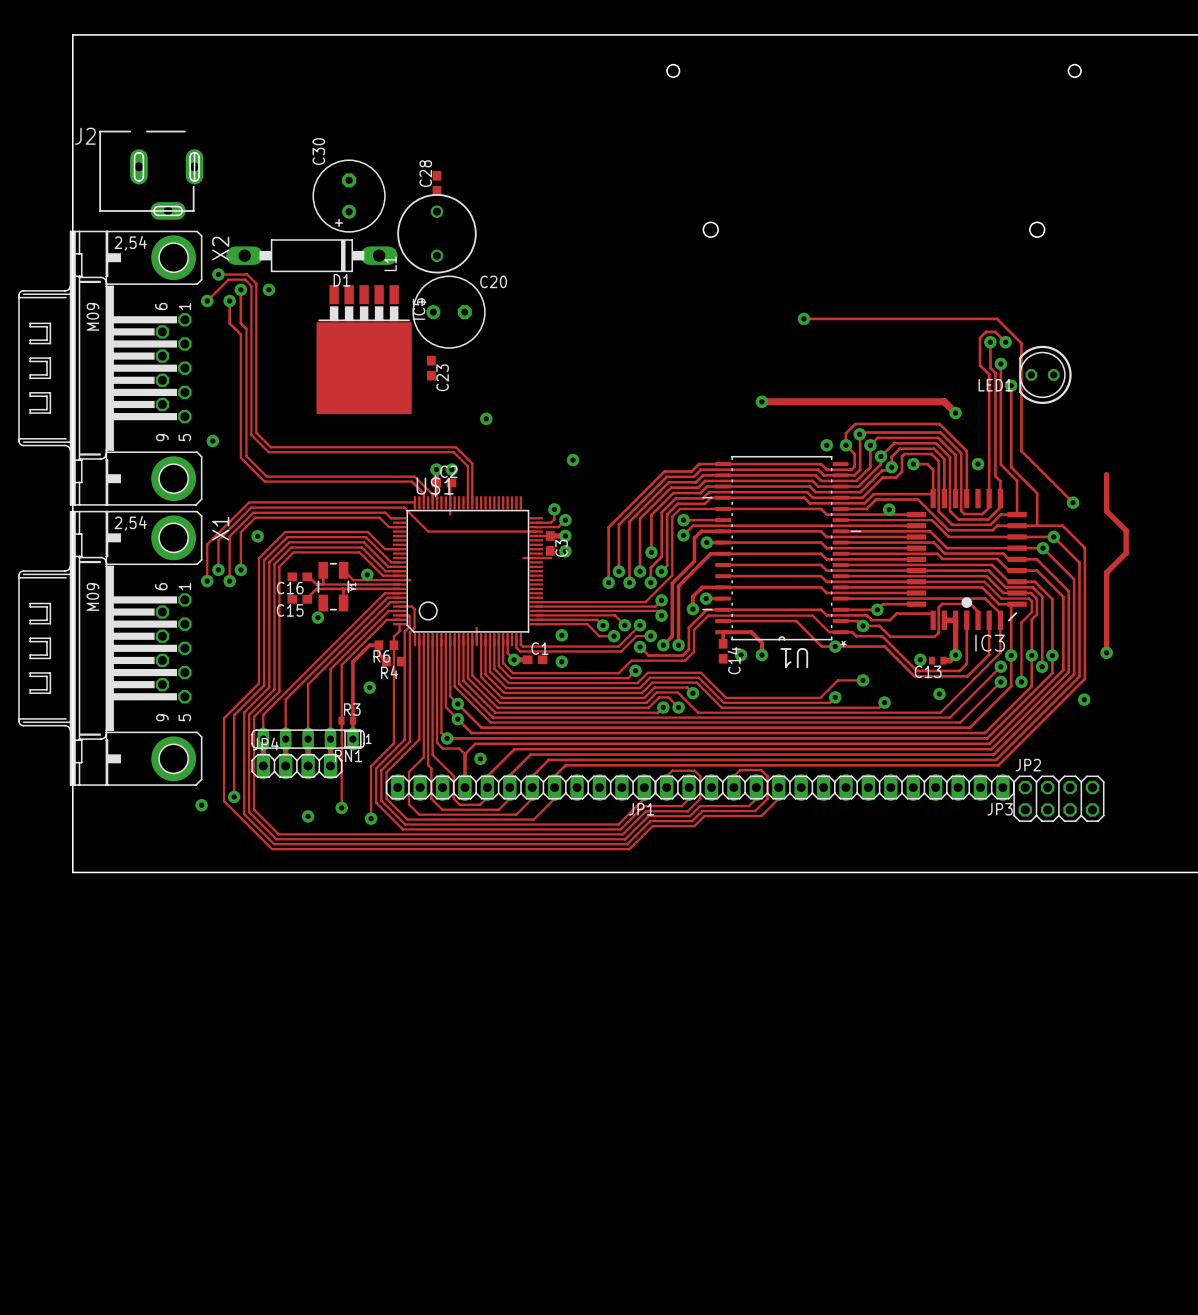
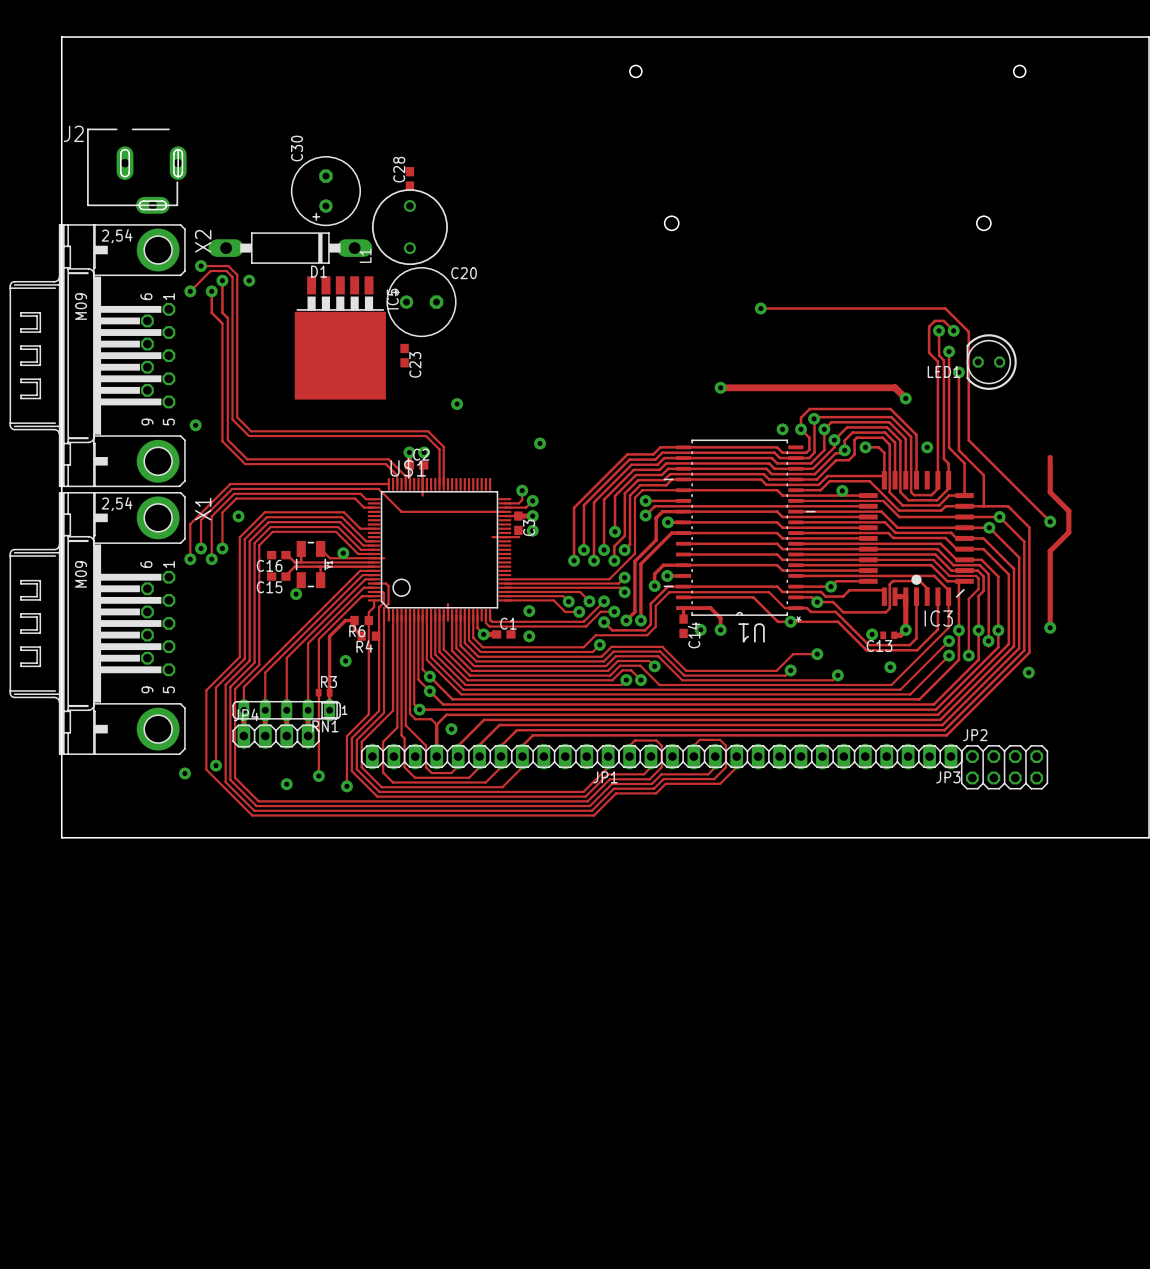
track: (1021, 451) (1073, 502) -> (968, 434) (968, 440) (1050, 521)
via position: (1073, 502) -> (1050, 521)

